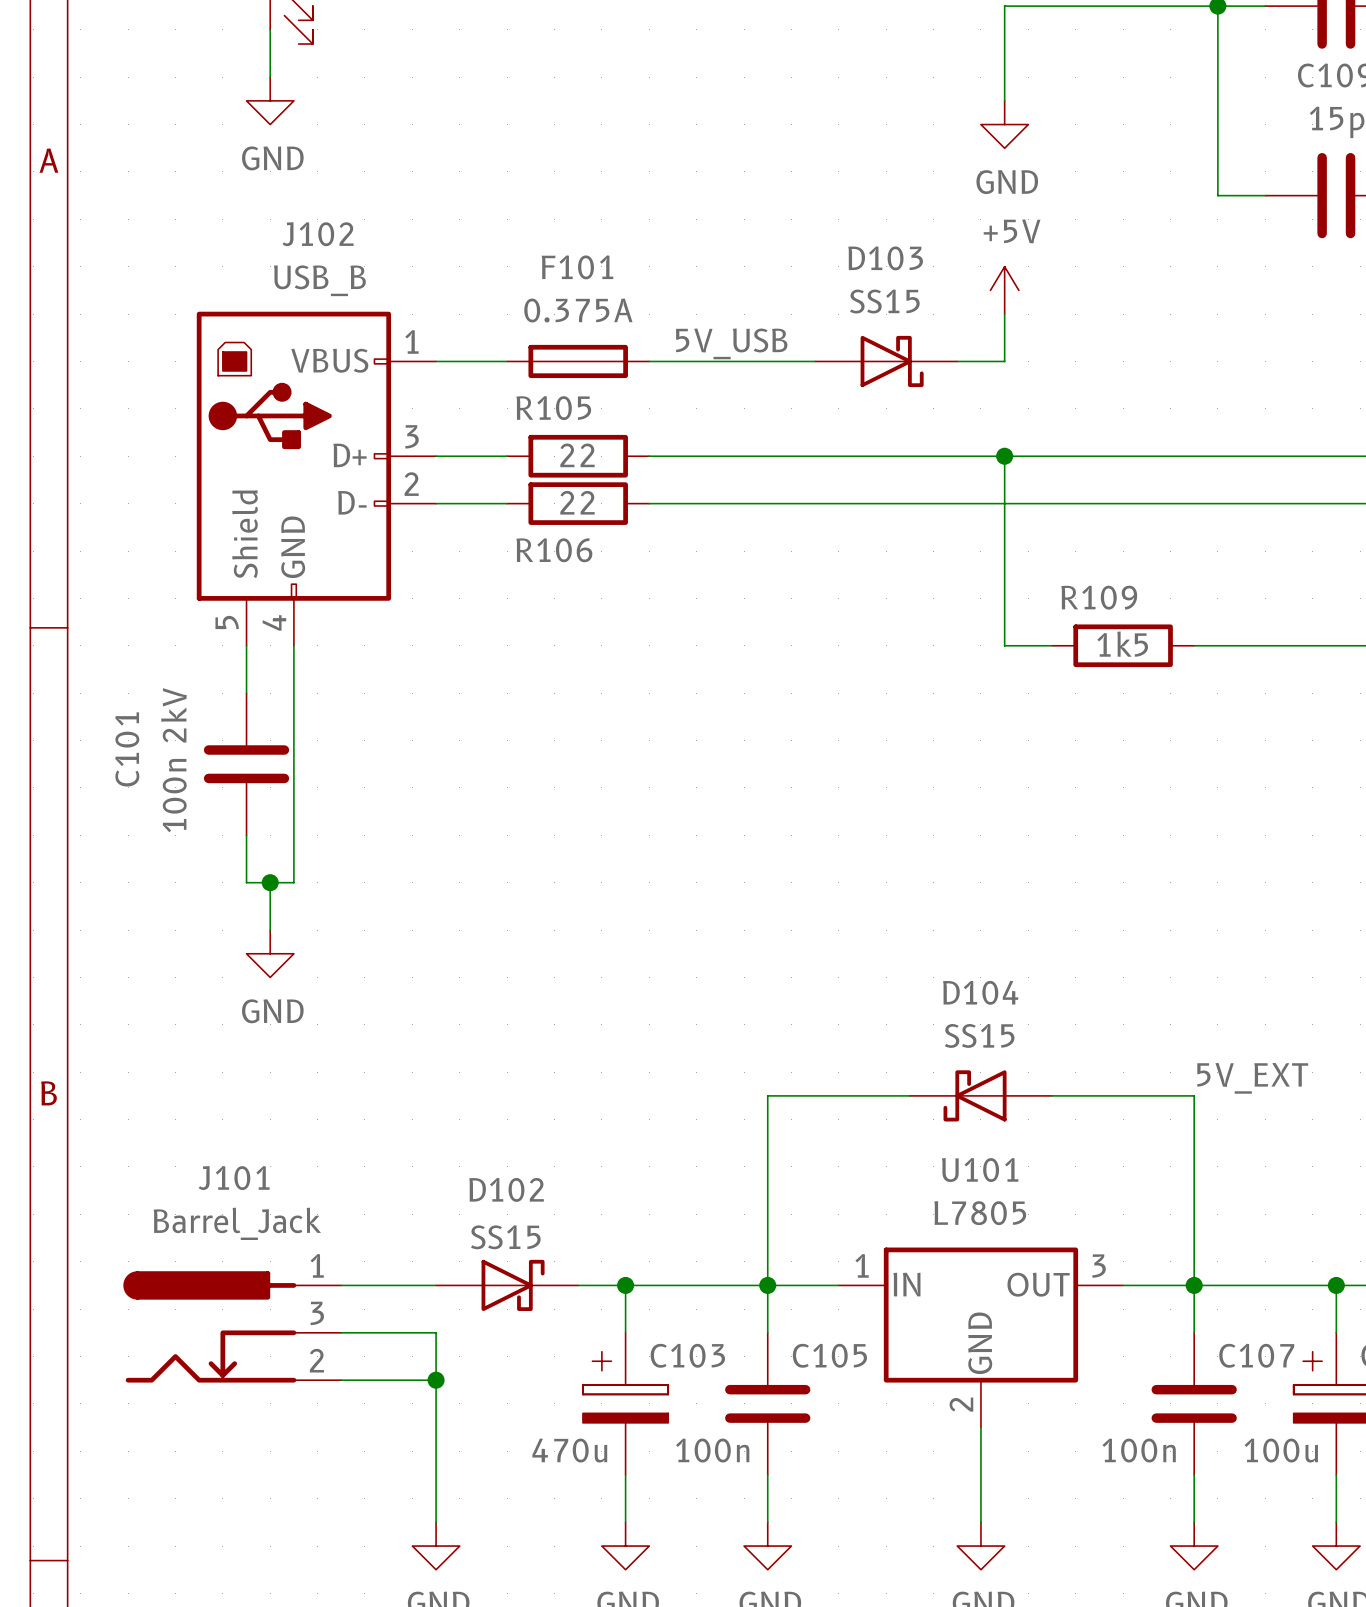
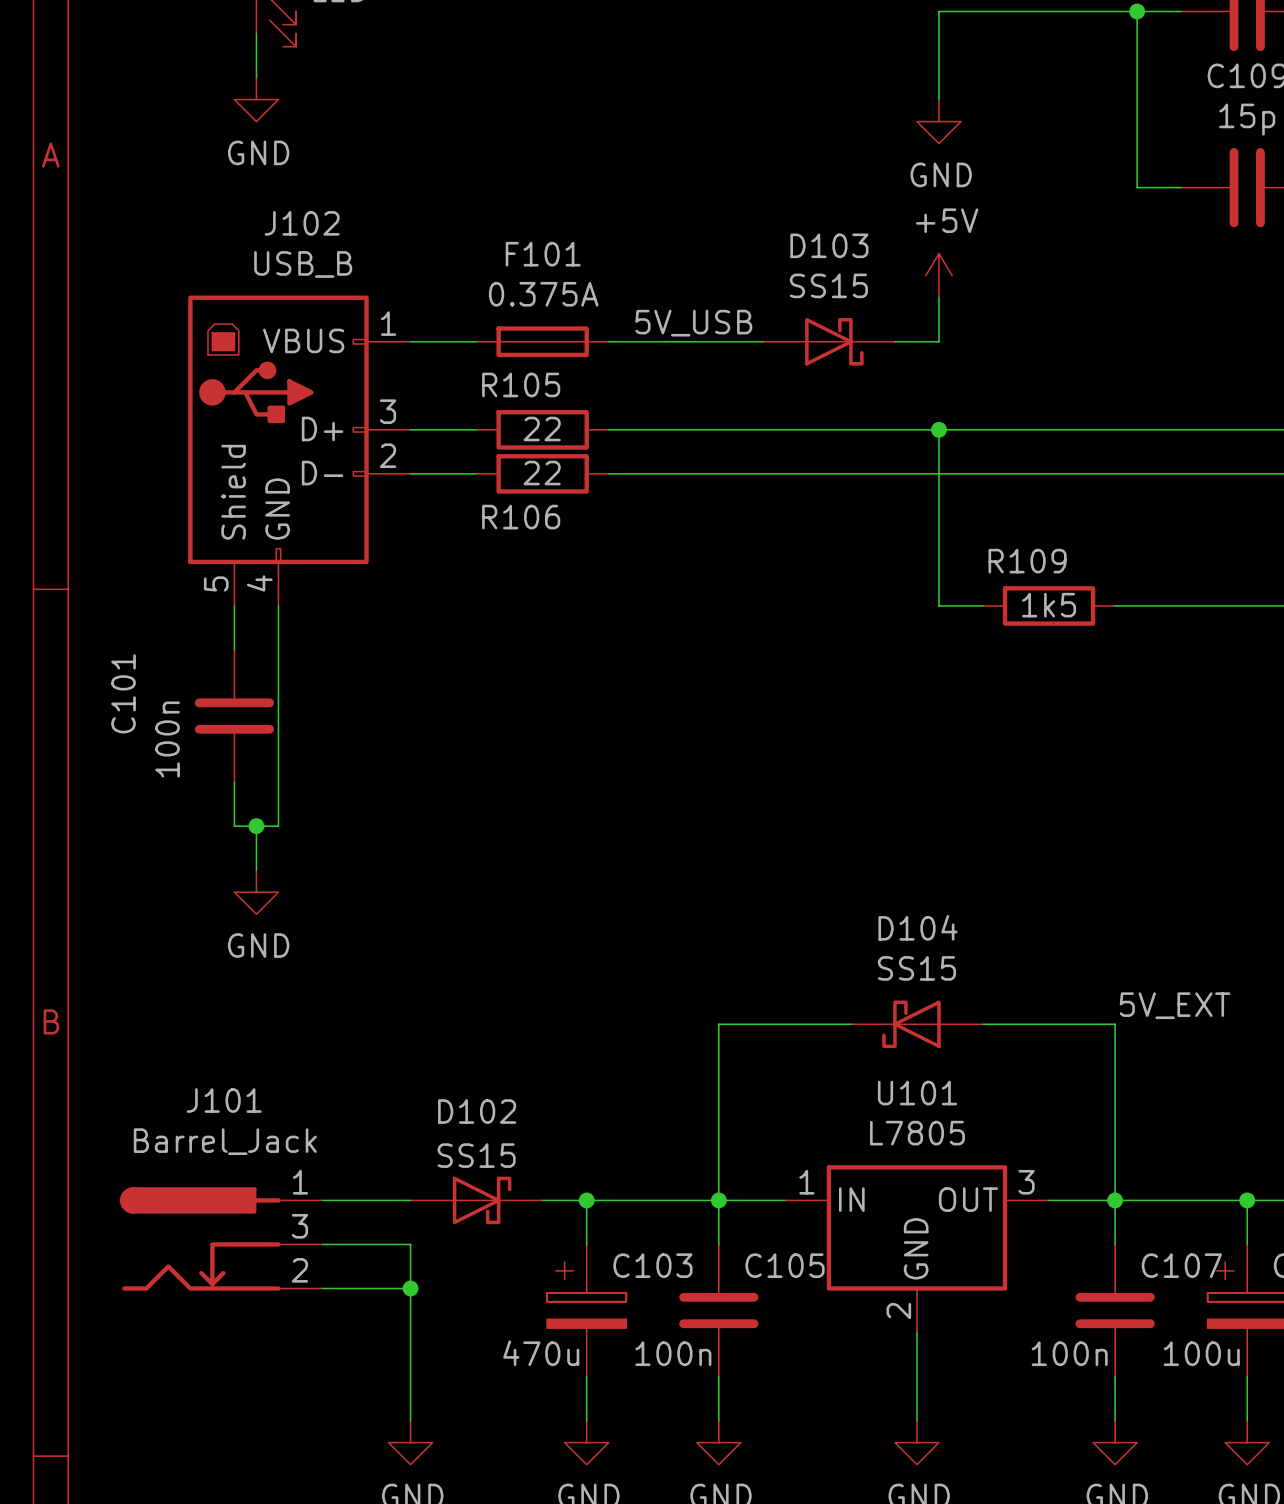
C101 value: 100n 2kV (173, 760) -> 100n (167, 739)

